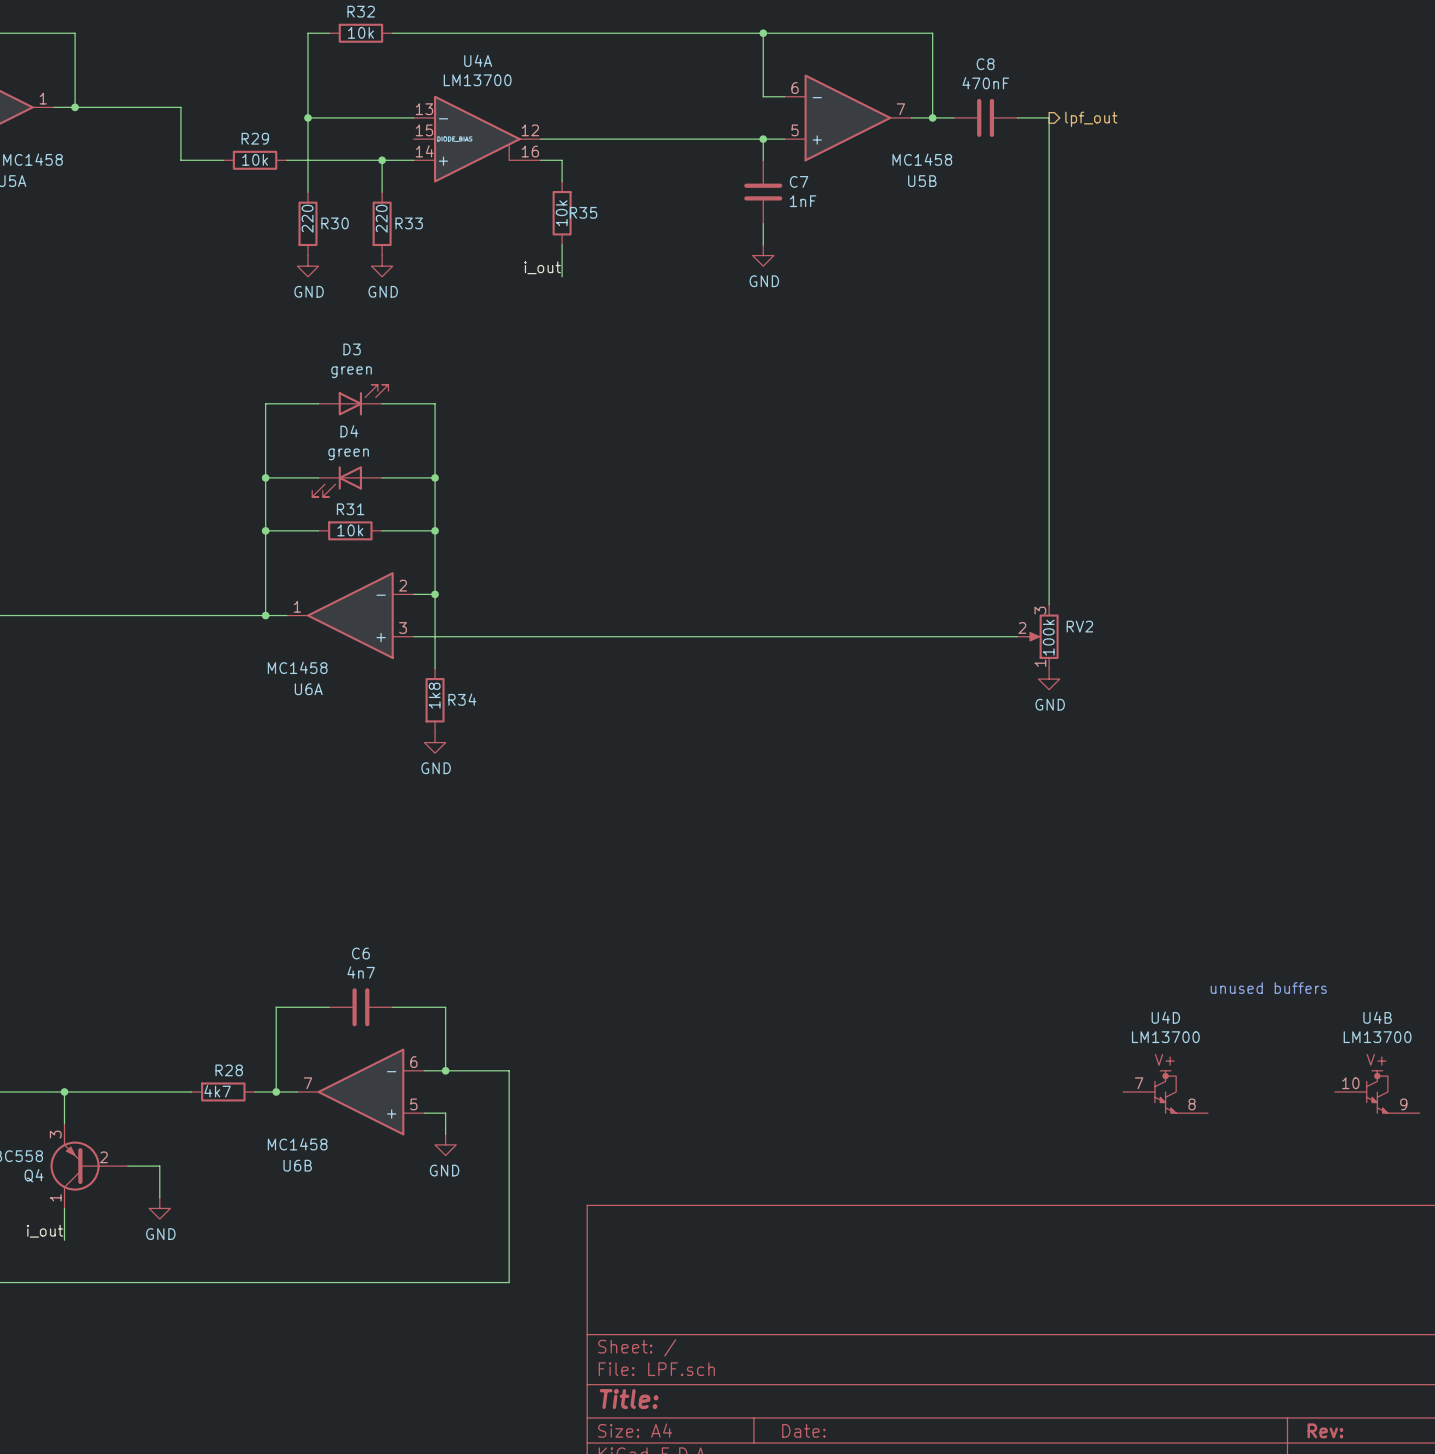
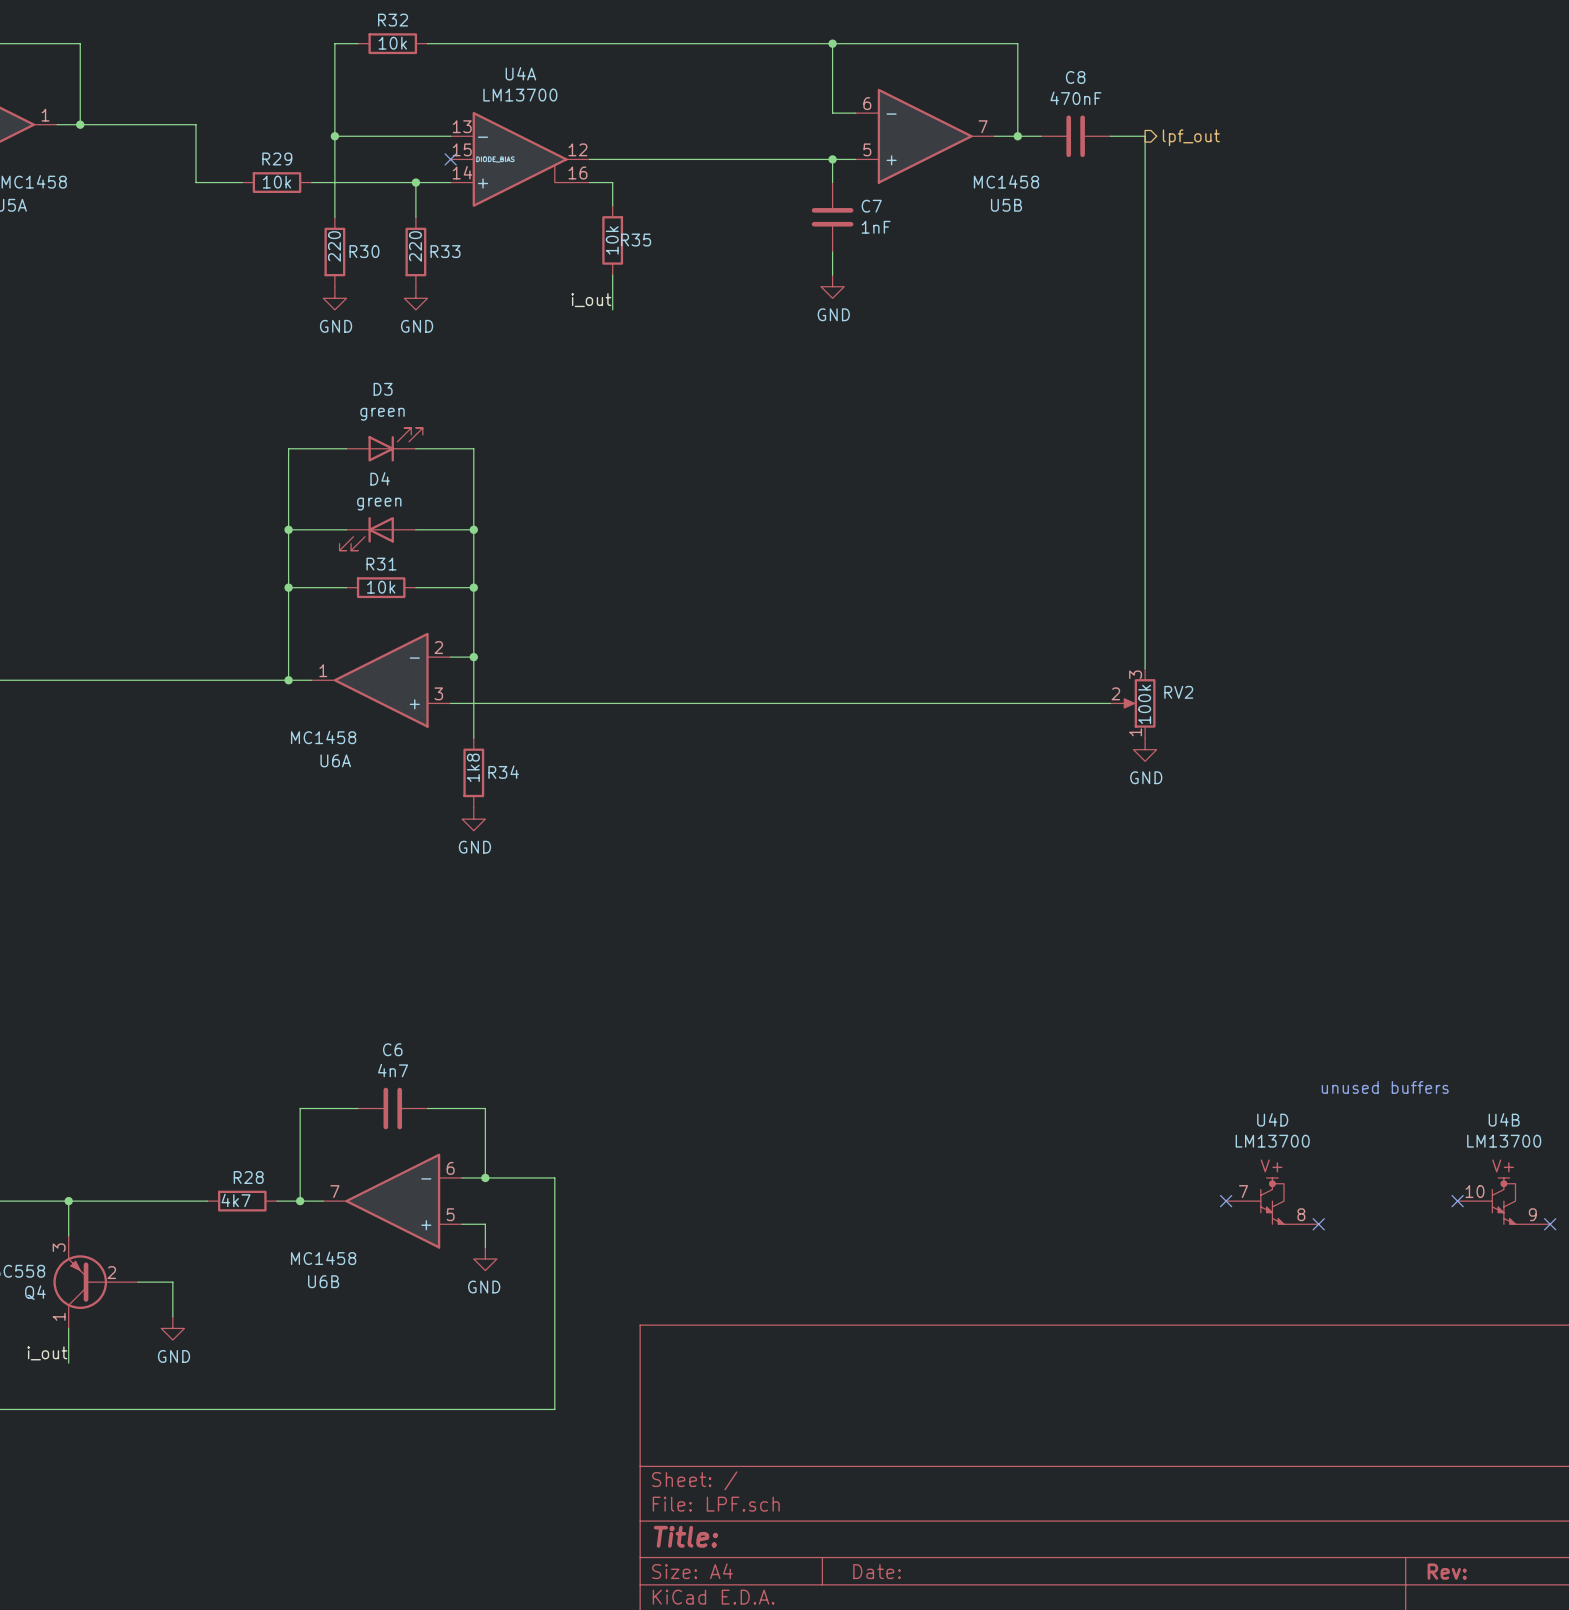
no-connect mark: none -> (450, 159)
no-connect mark: none -> (1226, 1201)
no-connect mark: none -> (1457, 1201)
no-connect mark: none -> (1318, 1224)
no-connect mark: none -> (1550, 1224)

